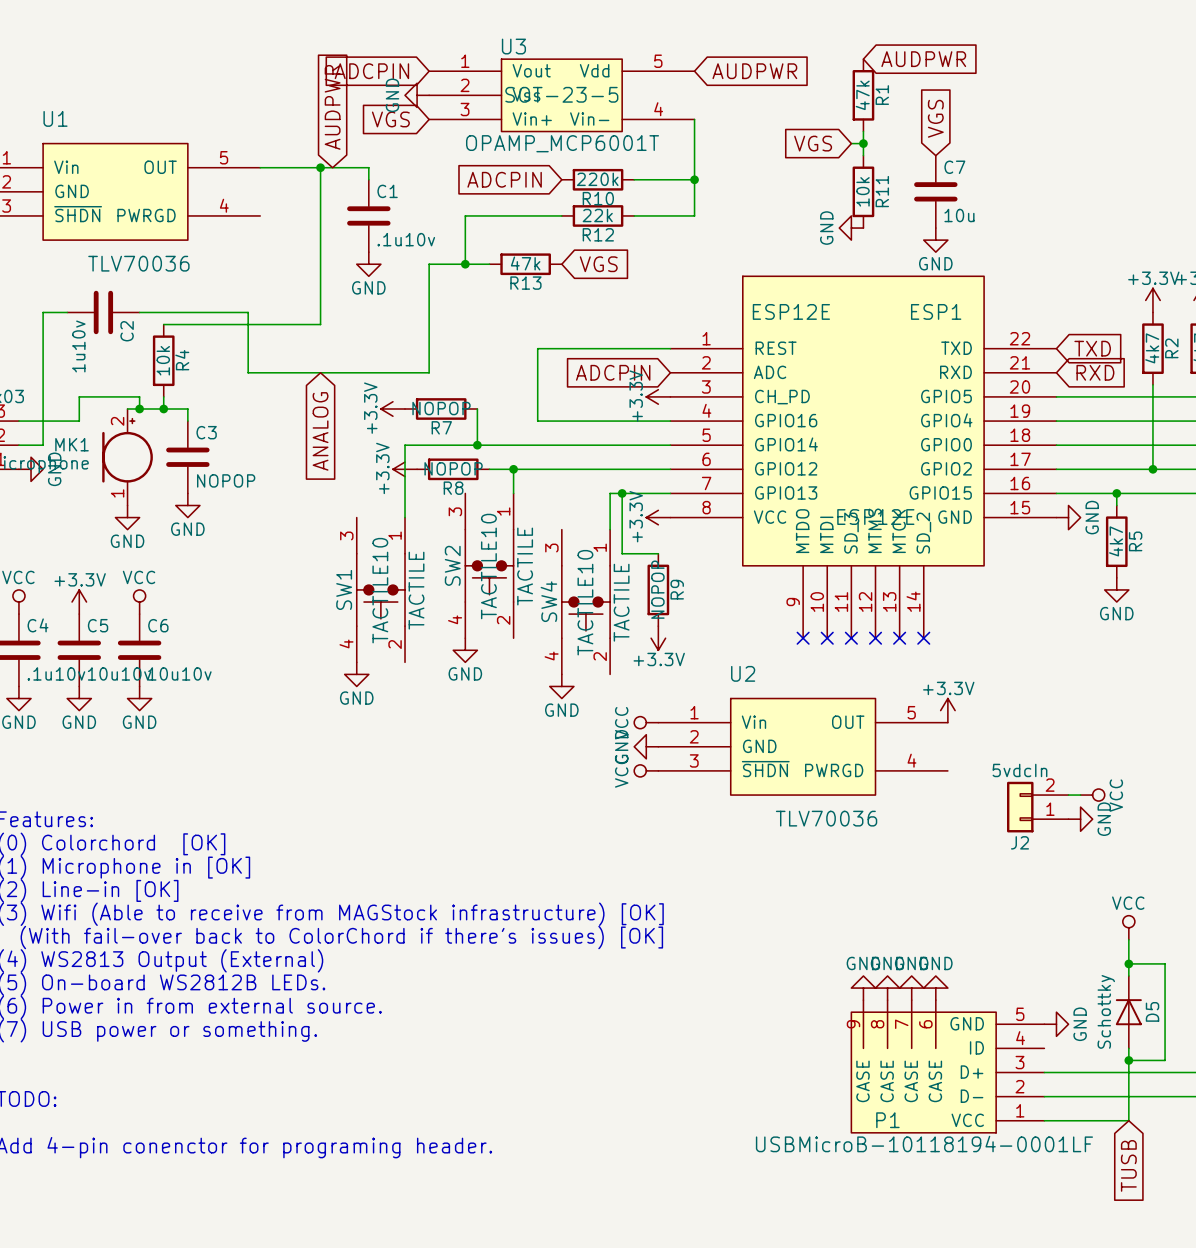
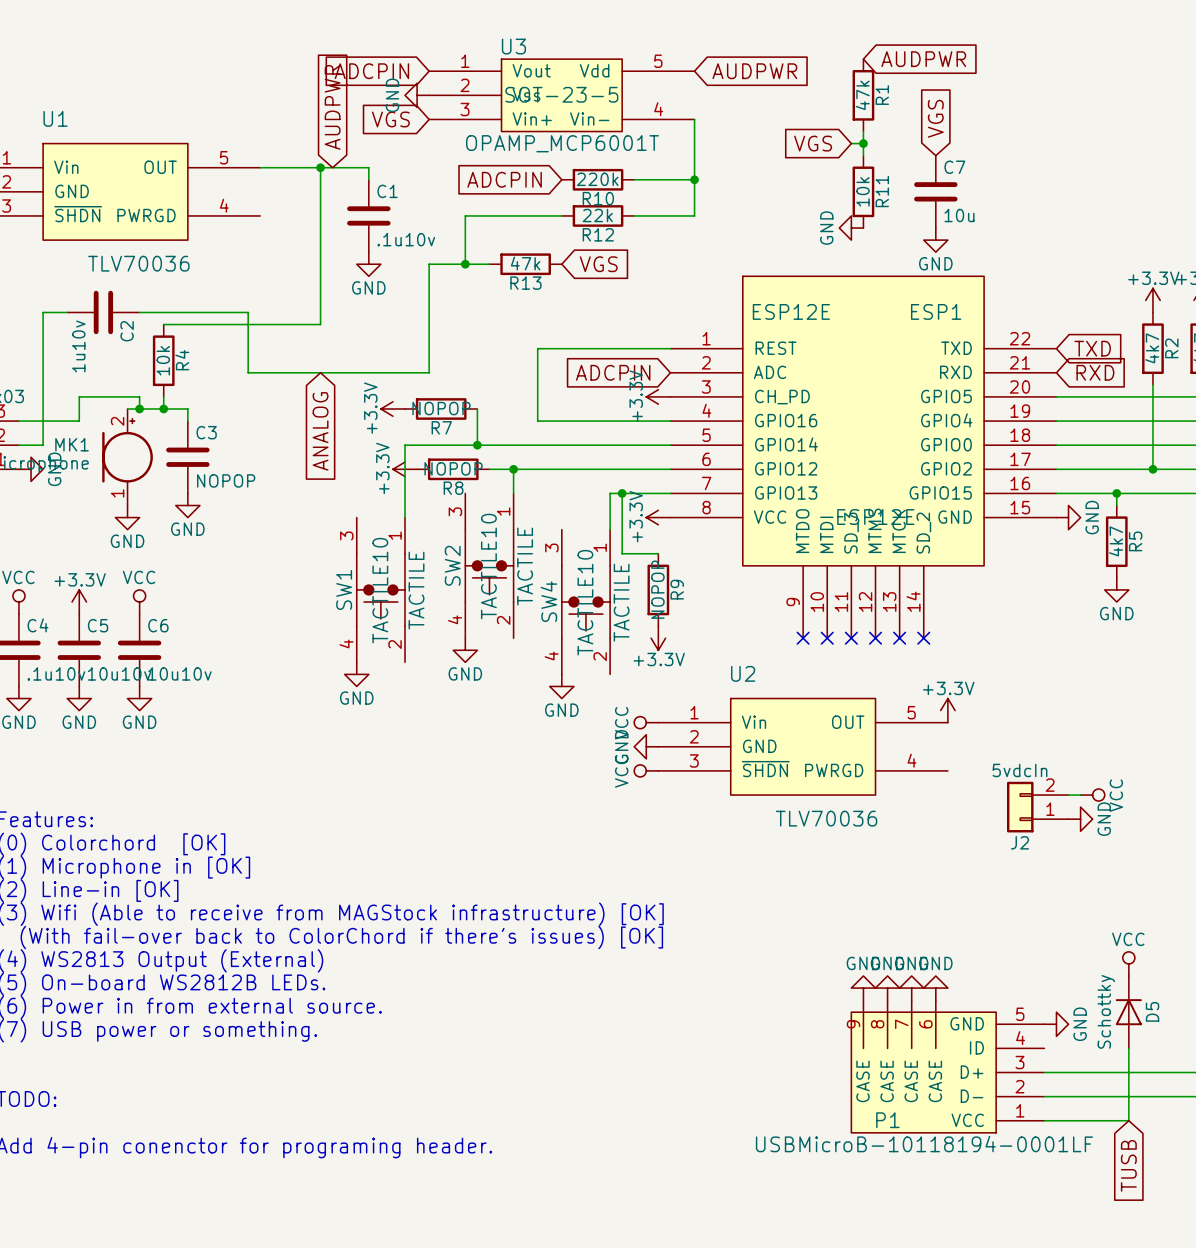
power symbol position: VCC (1128, 927) -> VCC (1128, 963)
wire: (1128, 939) (1128, 976) -> none
wire: (1128, 963) (1165, 963) (1165, 1060) (1128, 1060) -> none
junction: (1128, 963) -> none
junction: (1128, 1060) -> none

